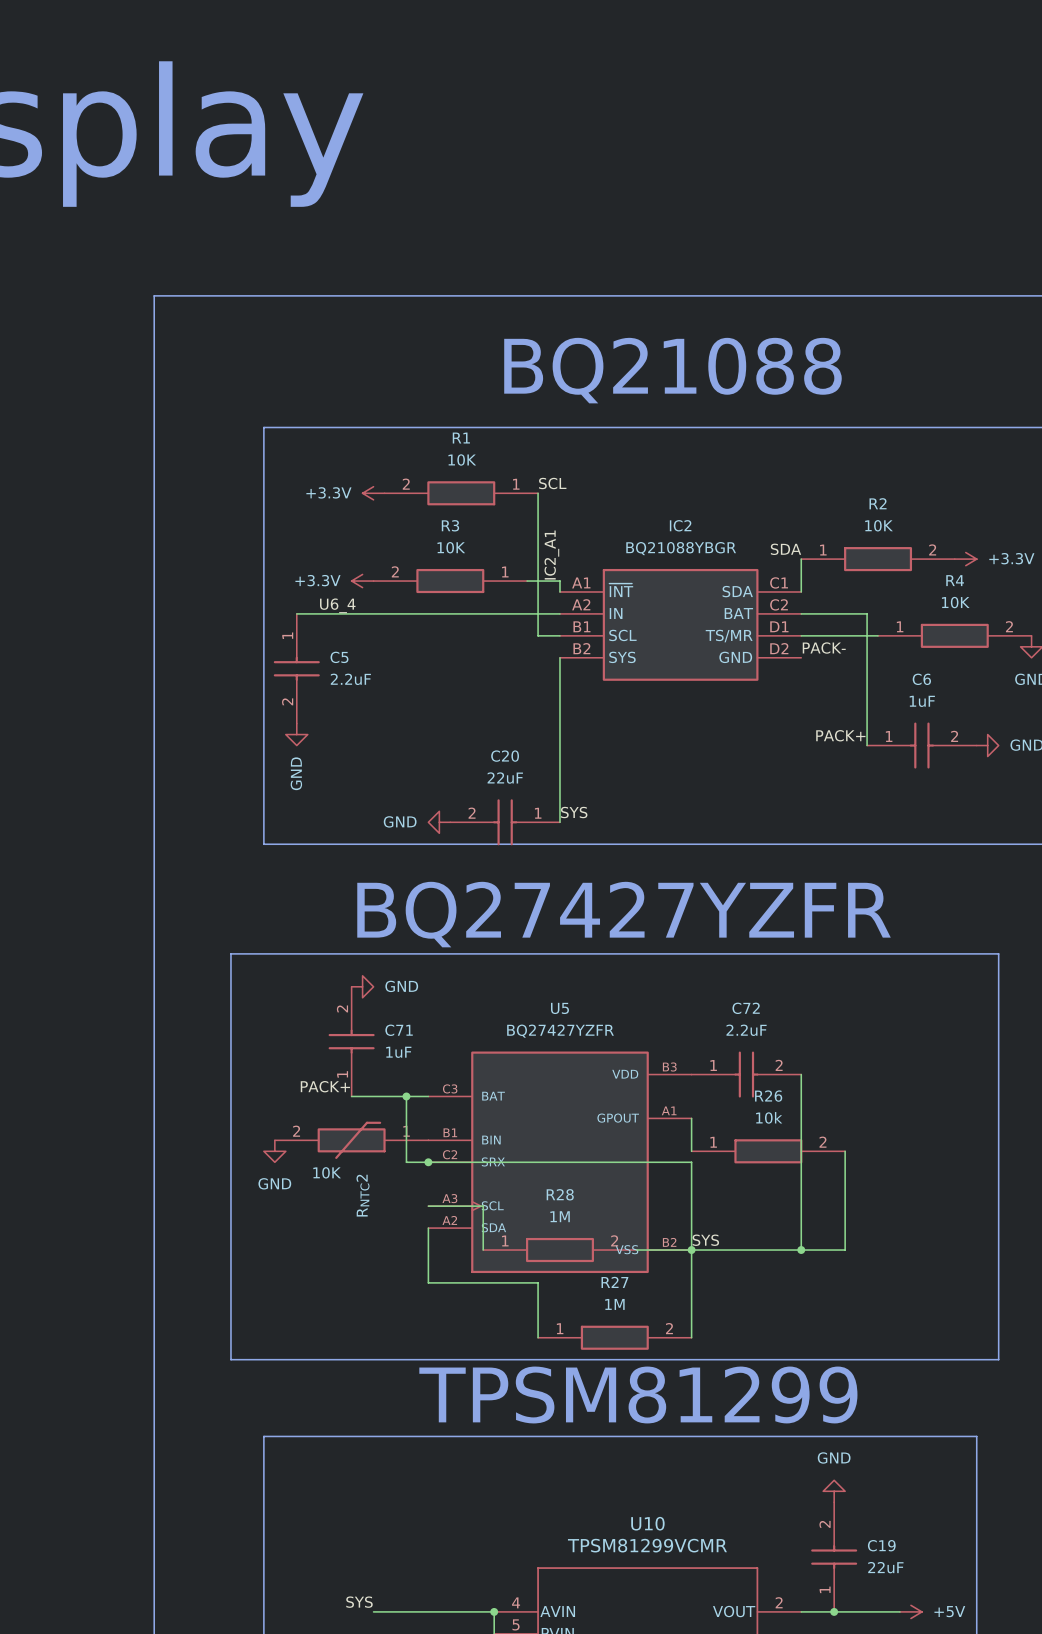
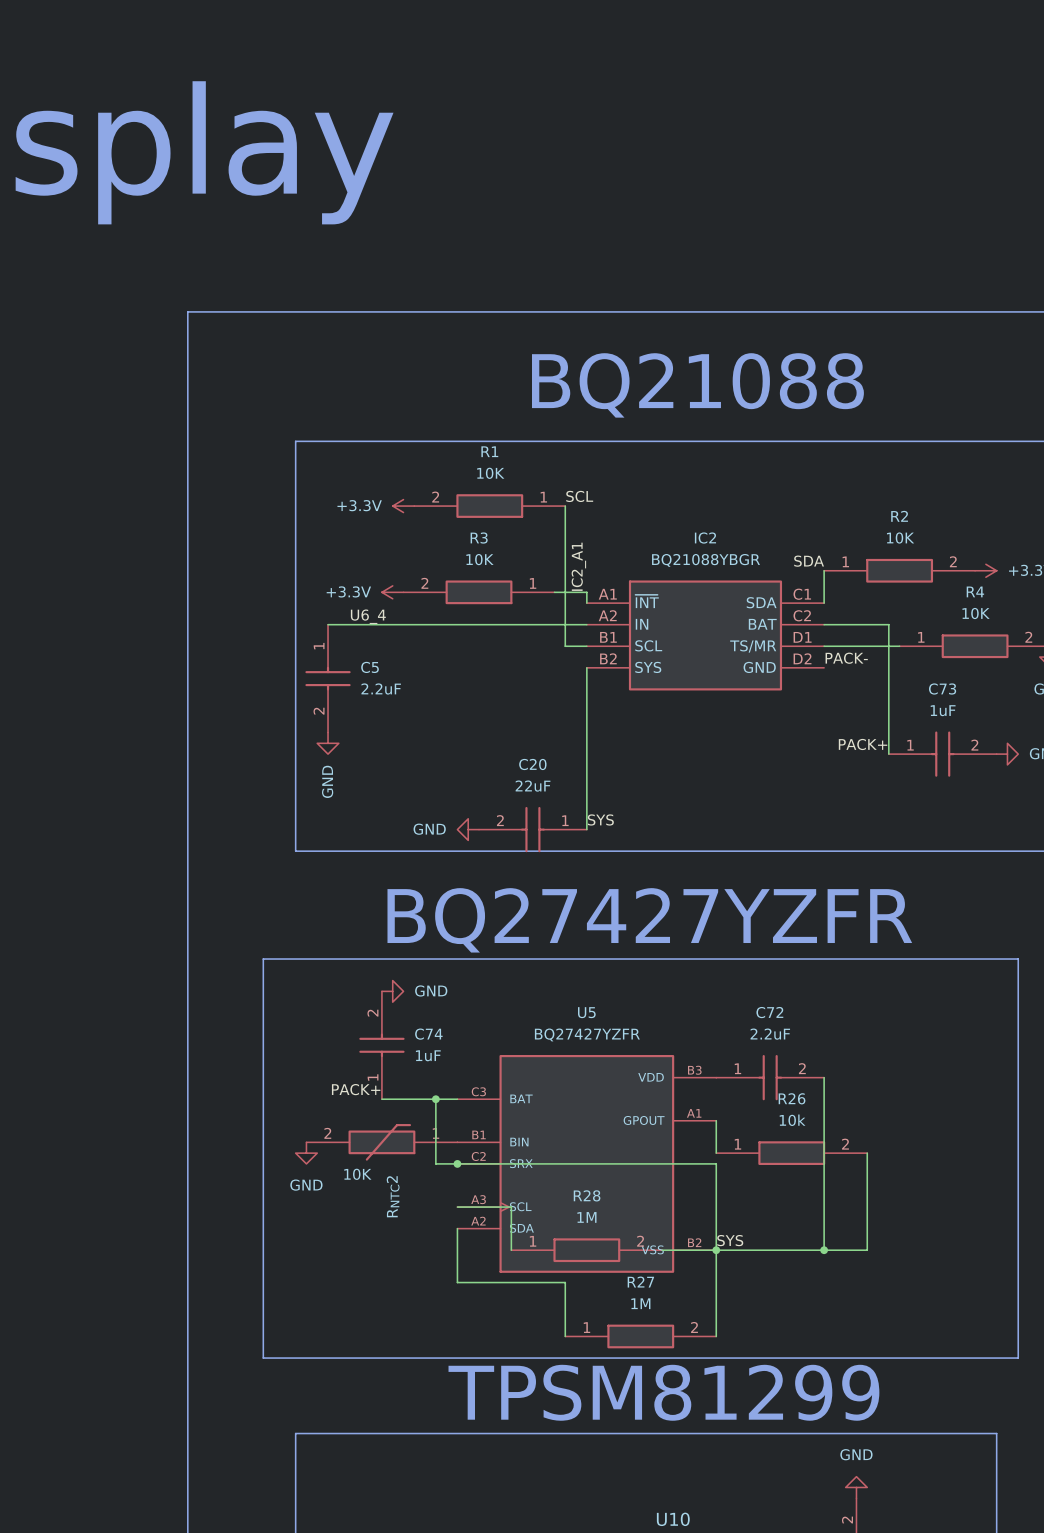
C6 name: C6 (921, 679) -> C73 (942, 689)
C71 name: C71 (399, 1030) -> C74 (428, 1034)

